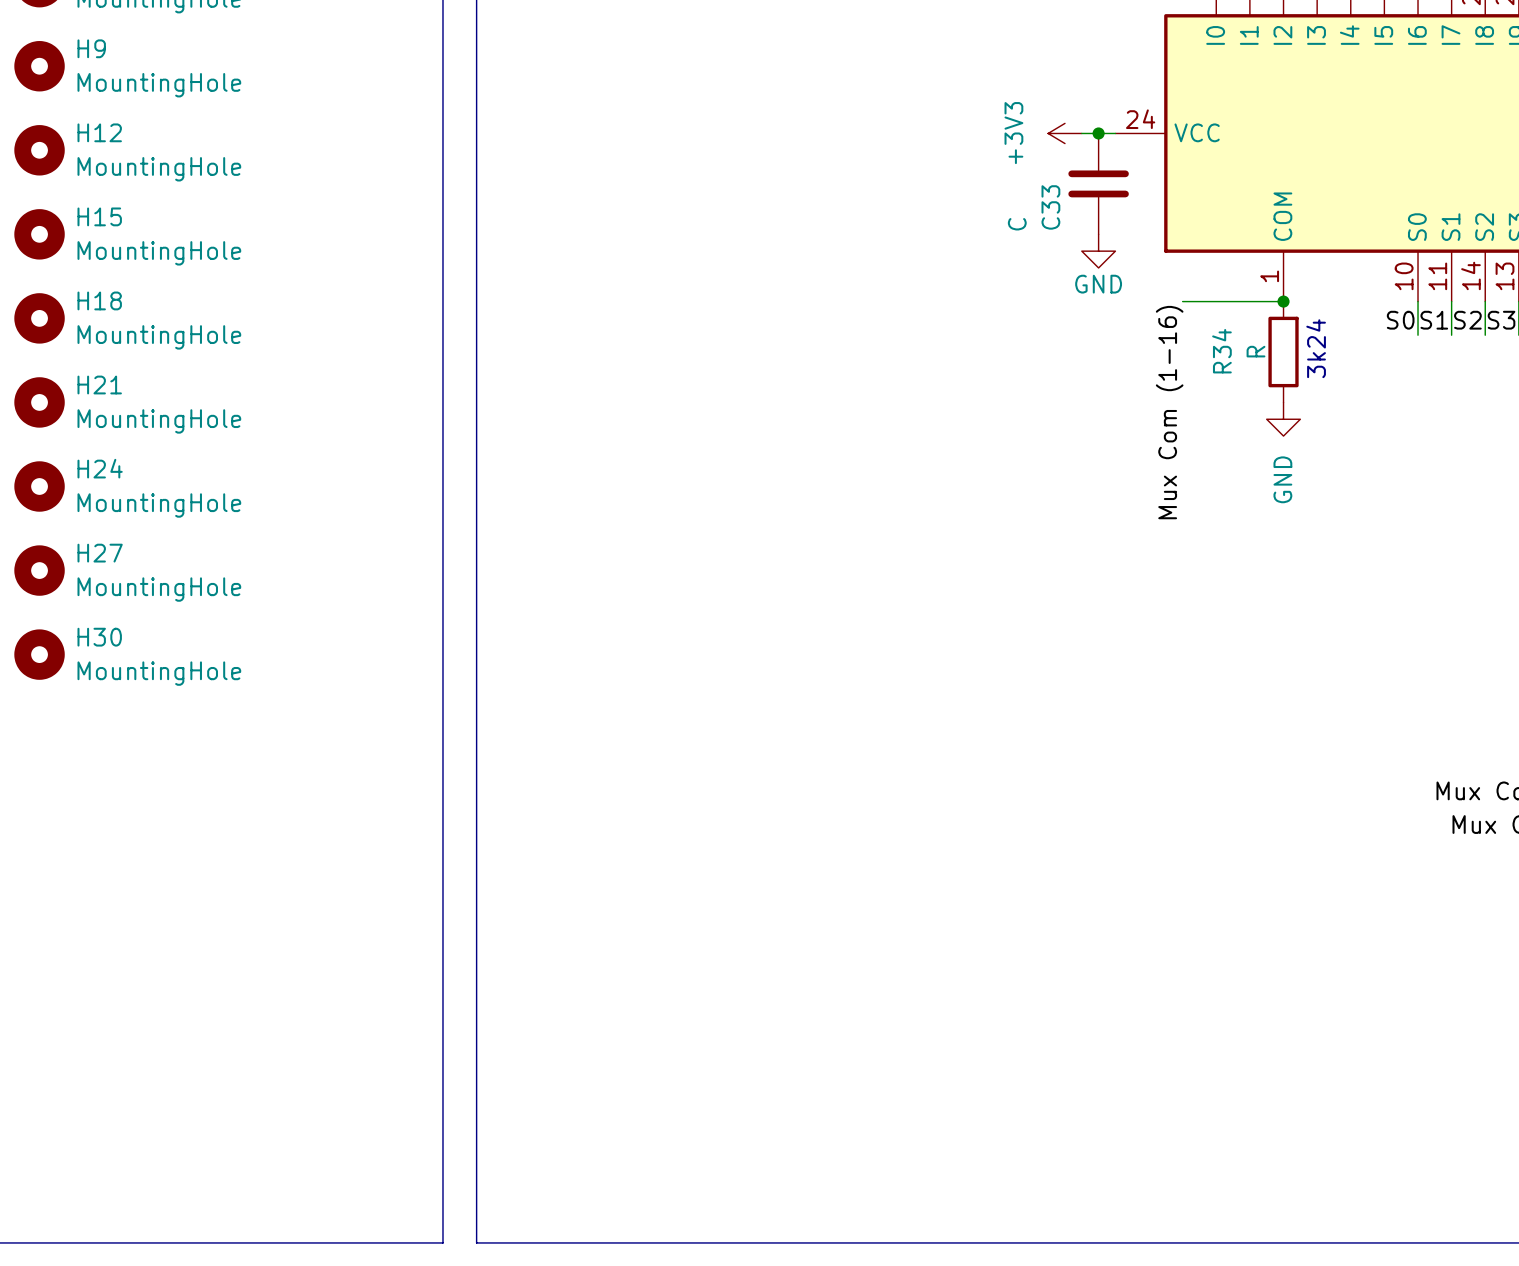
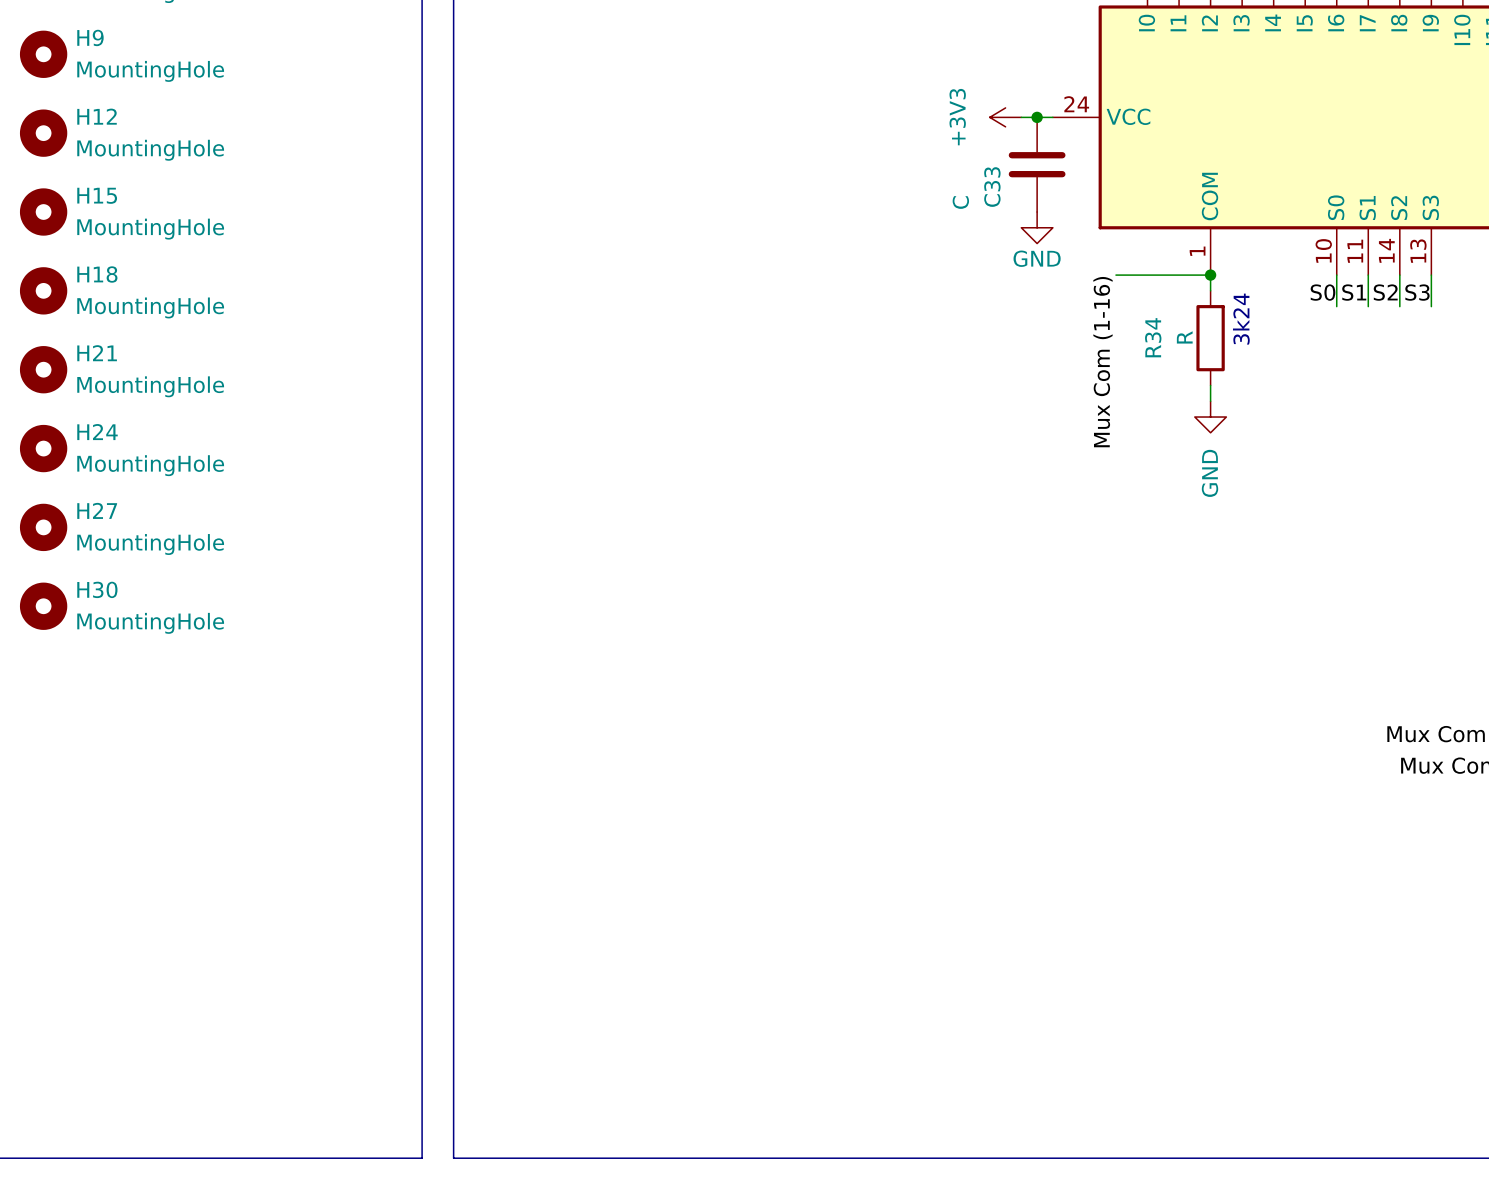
R34 position: (1283, 352) -> (1210, 338)
wire: none -> (1210, 385) (1210, 401)
power symbol position: GND (1283, 419) -> GND (1210, 417)

